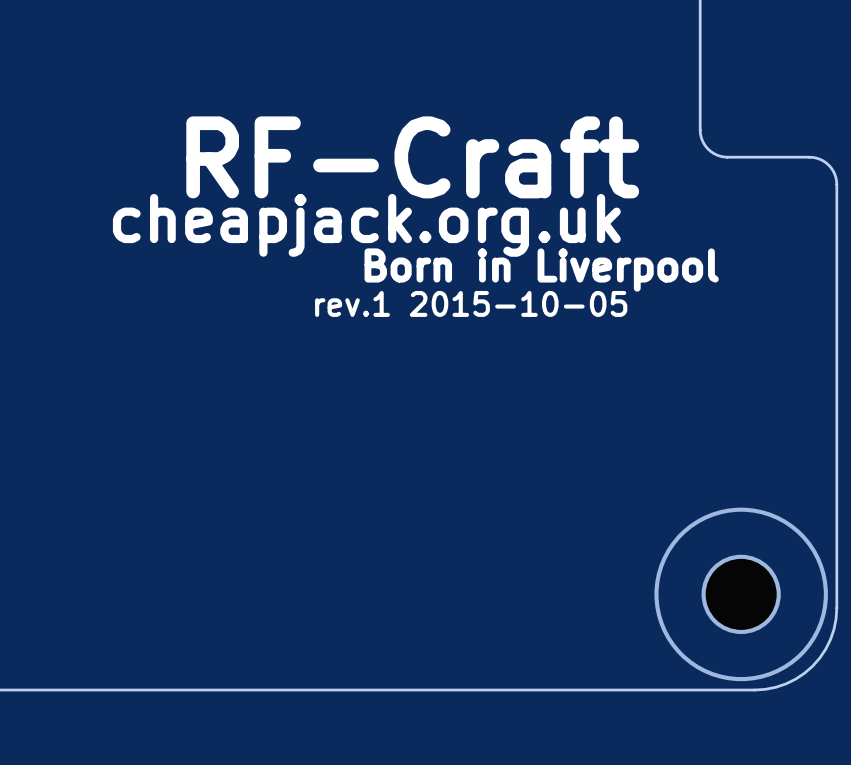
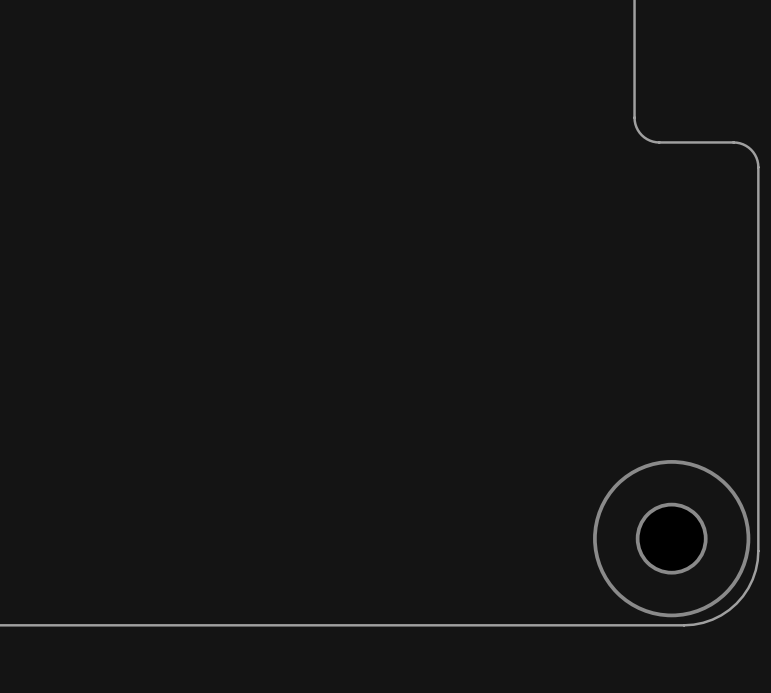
text: RF-Craft (412, 157) -> none
text: cheapjack.org.uk (366, 225) -> none
text: Born in Liverpool (541, 270) -> none
text: rev.1 2015-10-05 (471, 303) -> none

